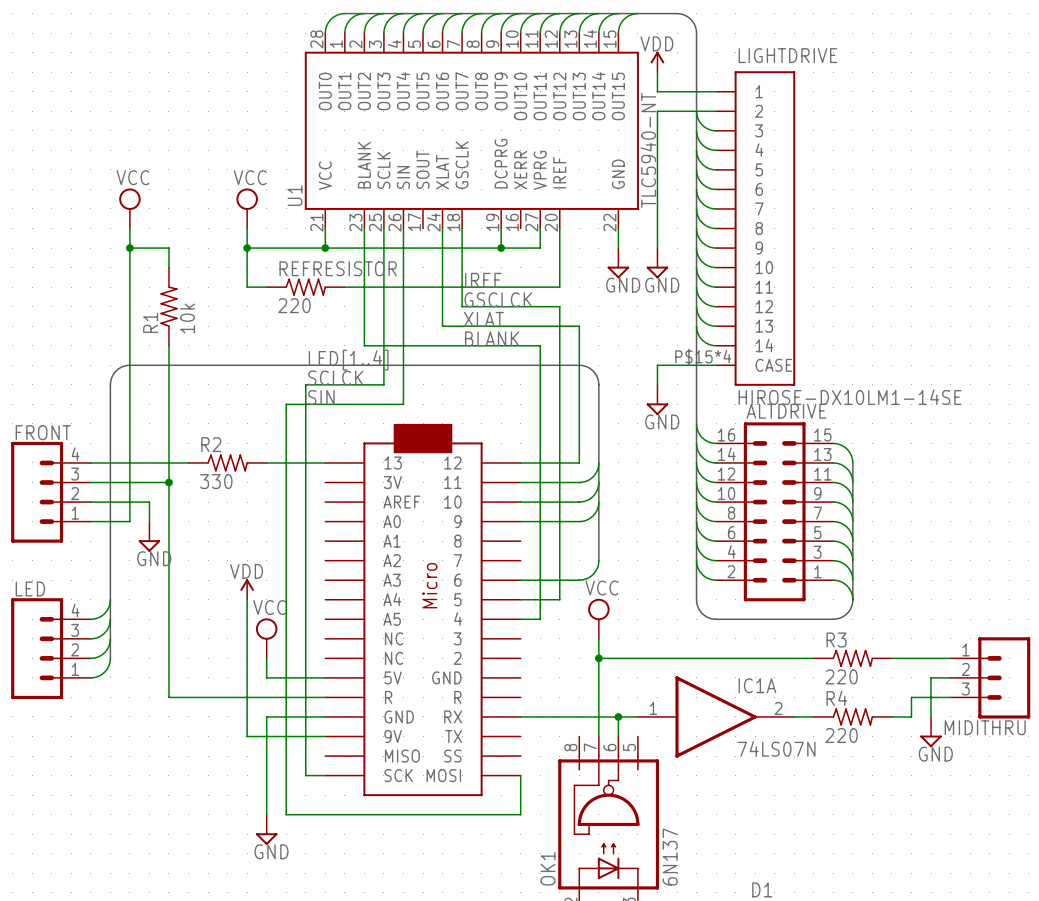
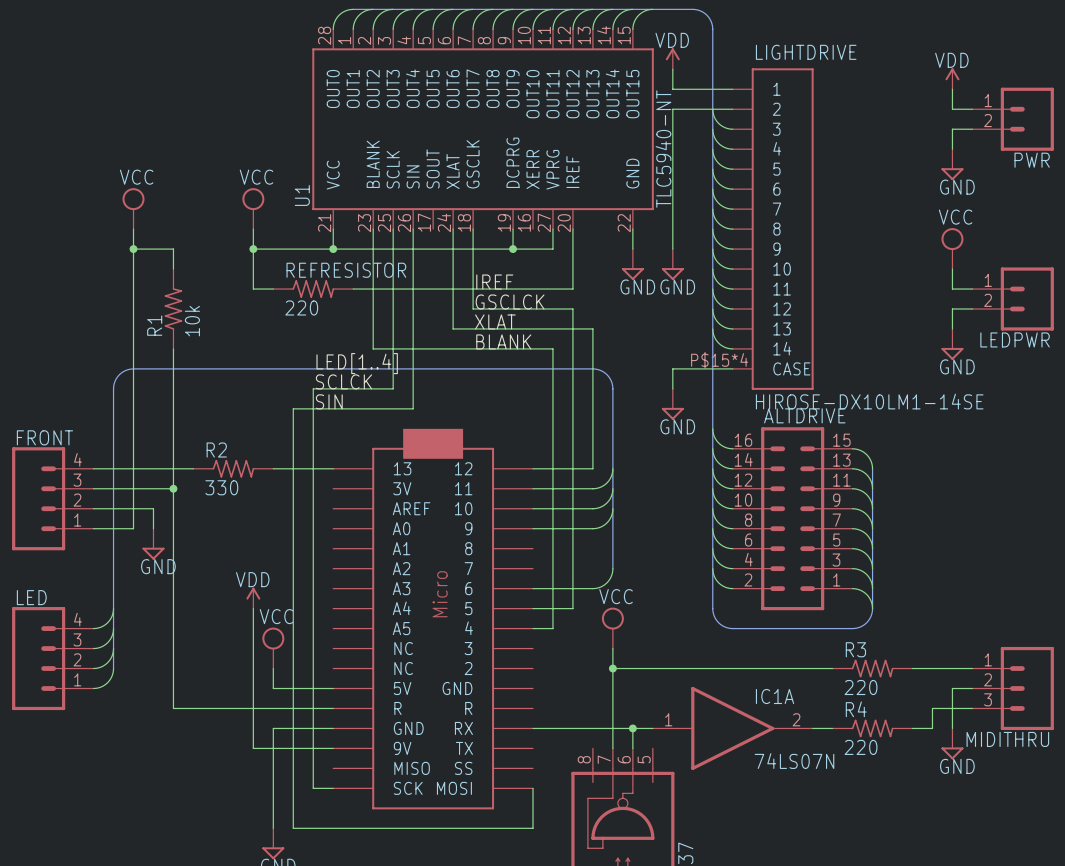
power symbol: none -> VDD (952, 78)
wire: none -> (952, 89) (952, 109) (972, 109)
PWR: none -> (1013, 119)
wire: none -> (972, 129) (952, 129) (952, 149)
power symbol: none -> GND (952, 164)
power symbol: none -> VCC (952, 248)
wire: none -> (952, 269) (952, 289) (972, 289)
LEDPWR: none -> (1013, 299)
wire: none -> (972, 308) (952, 308) (952, 328)
power symbol: none -> GND (952, 344)

